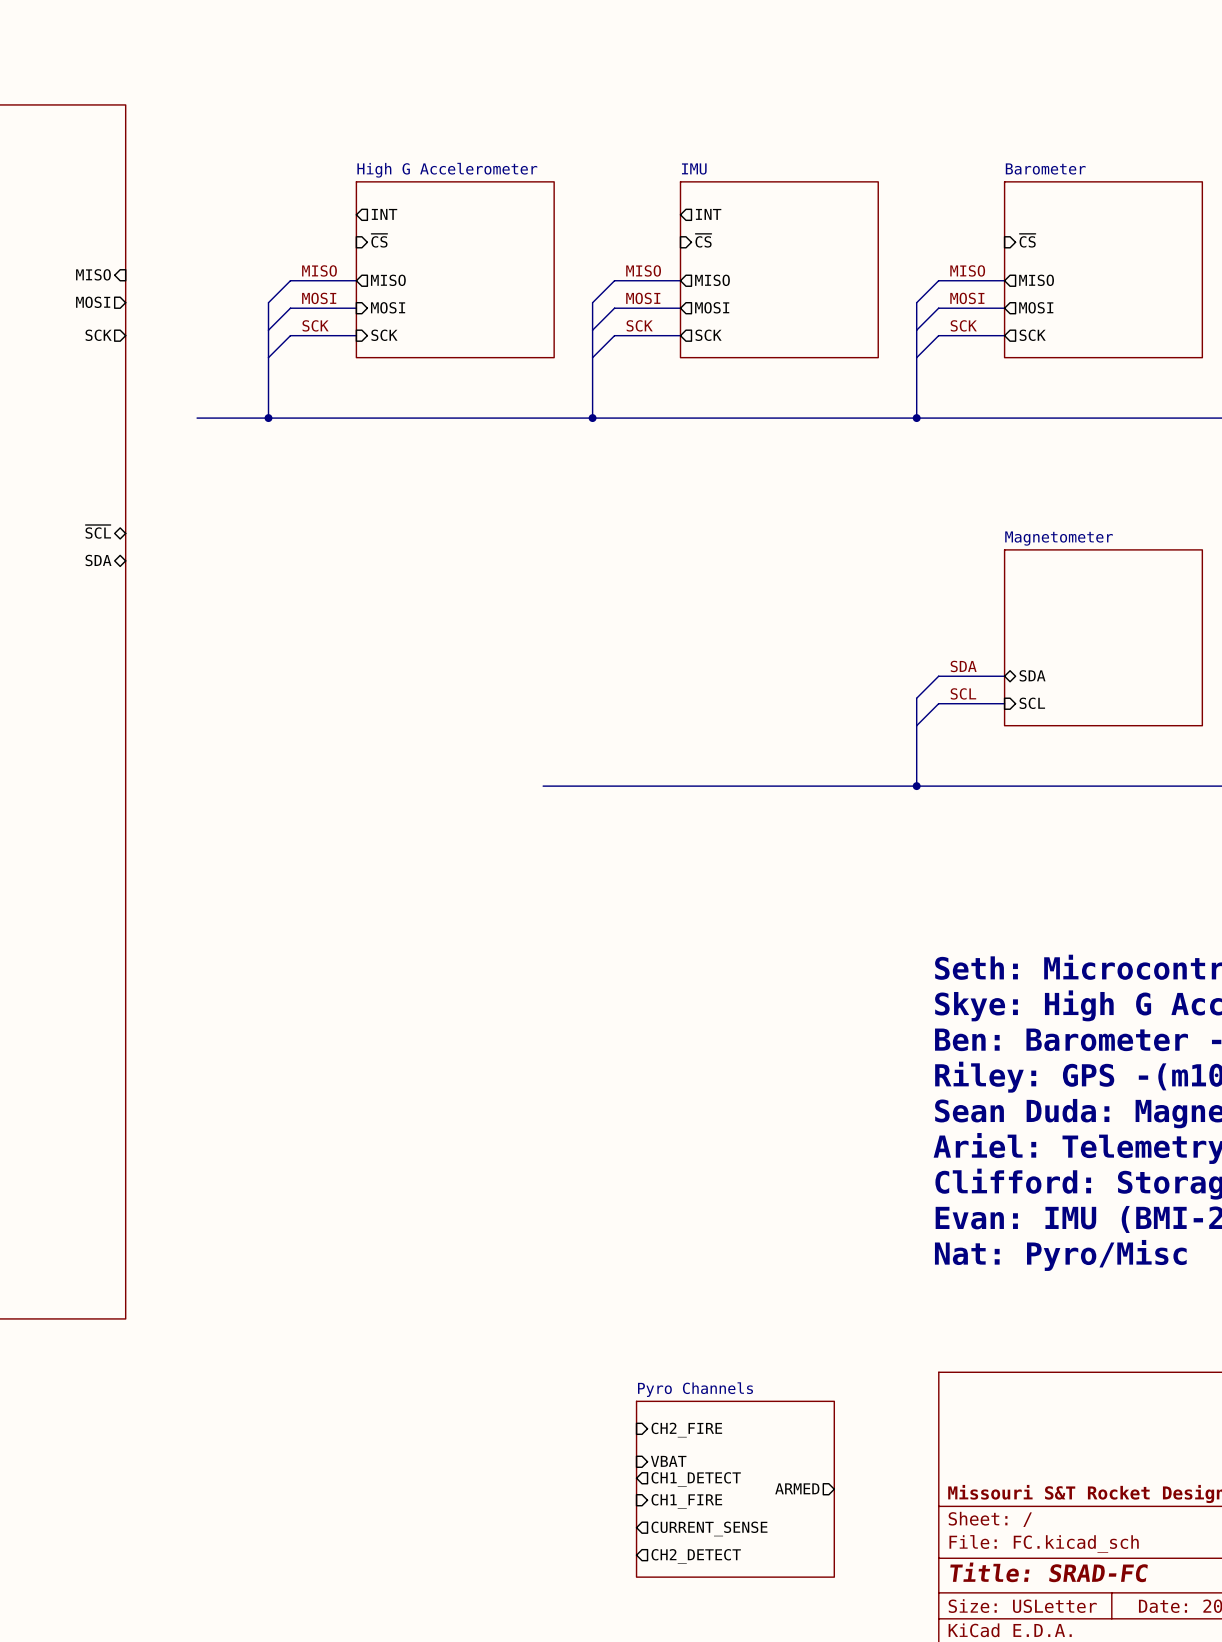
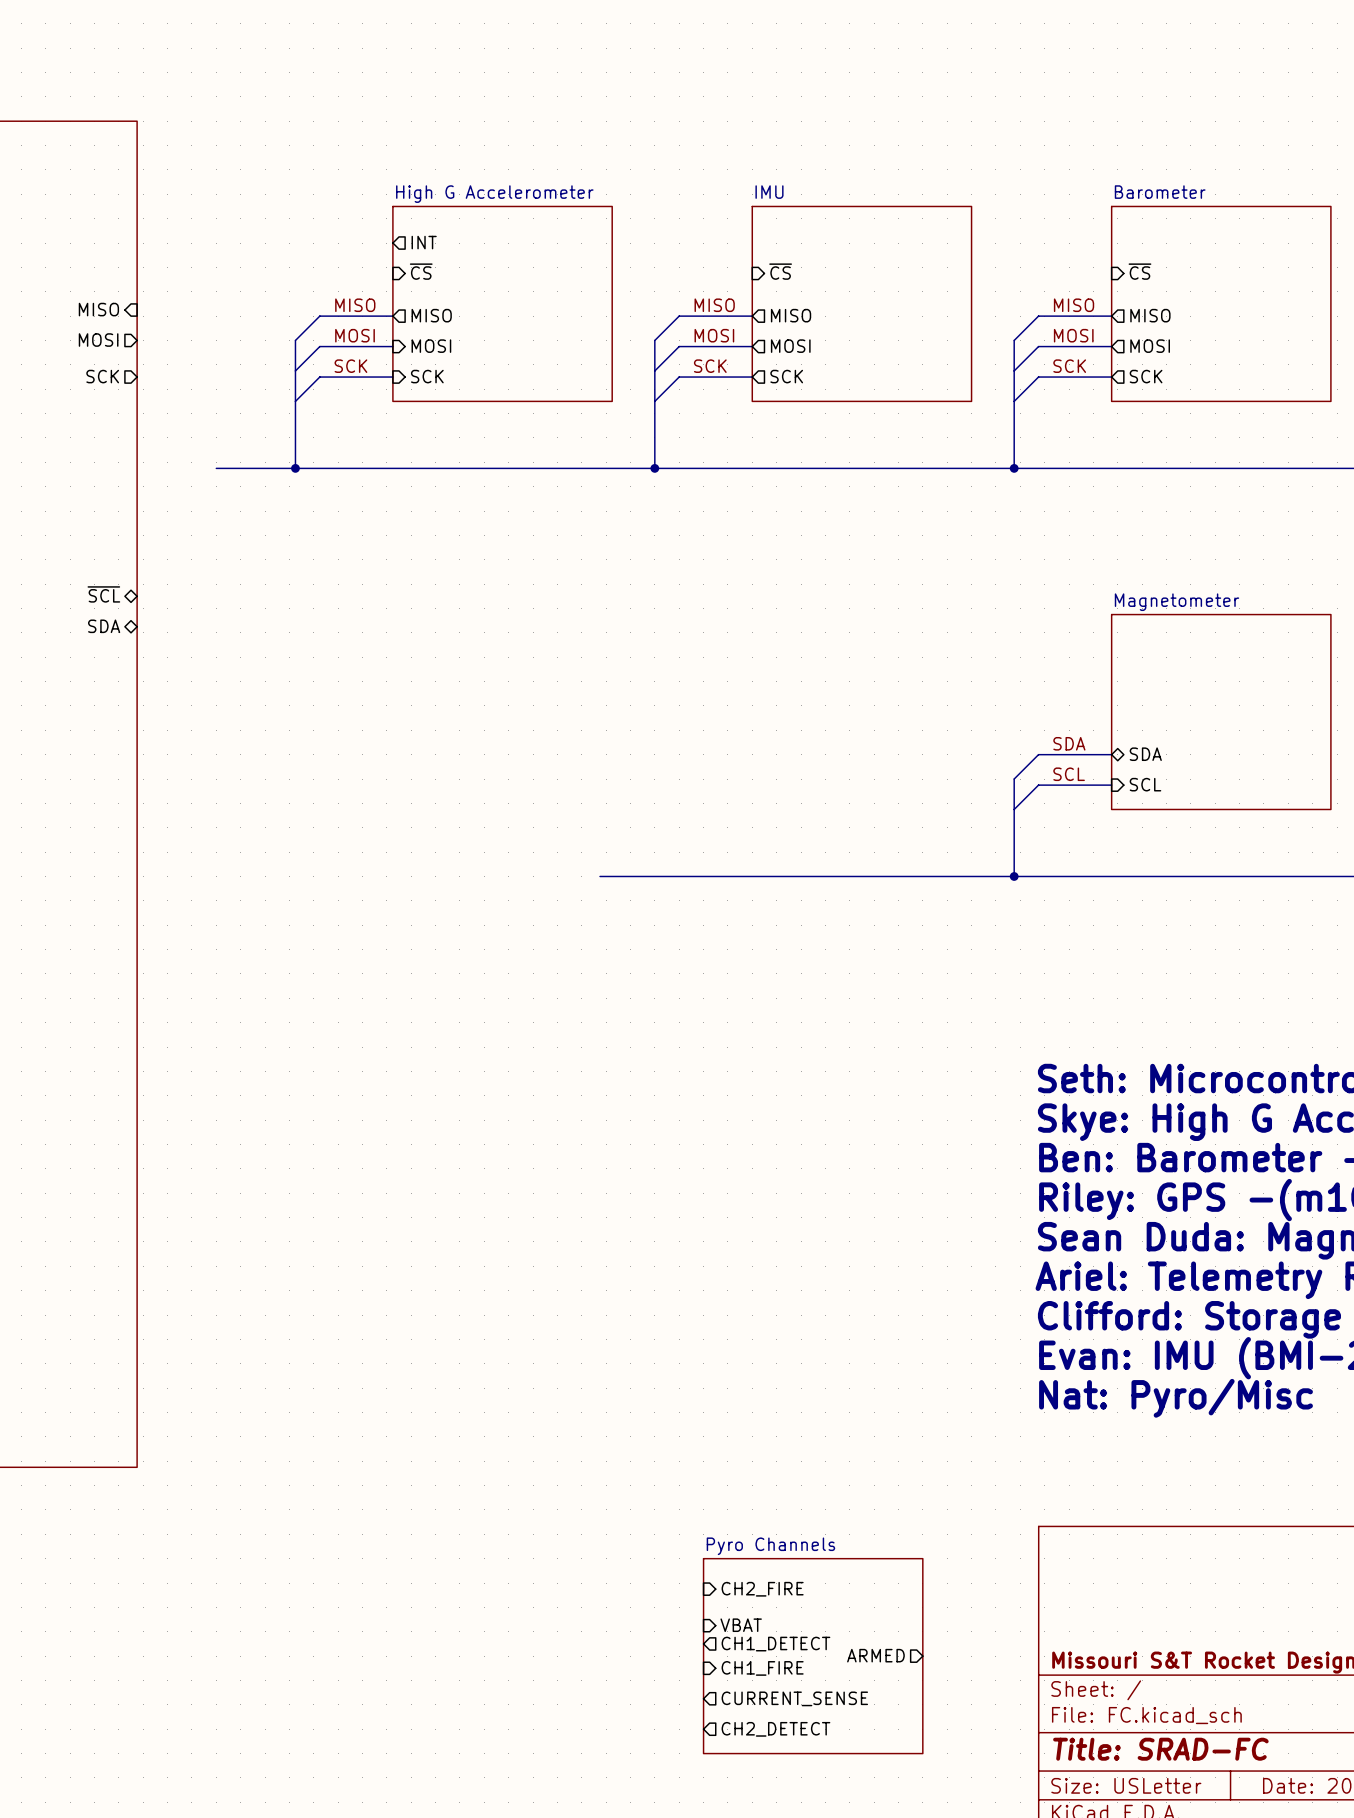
sheet pin: INT (708, 214) -> none

